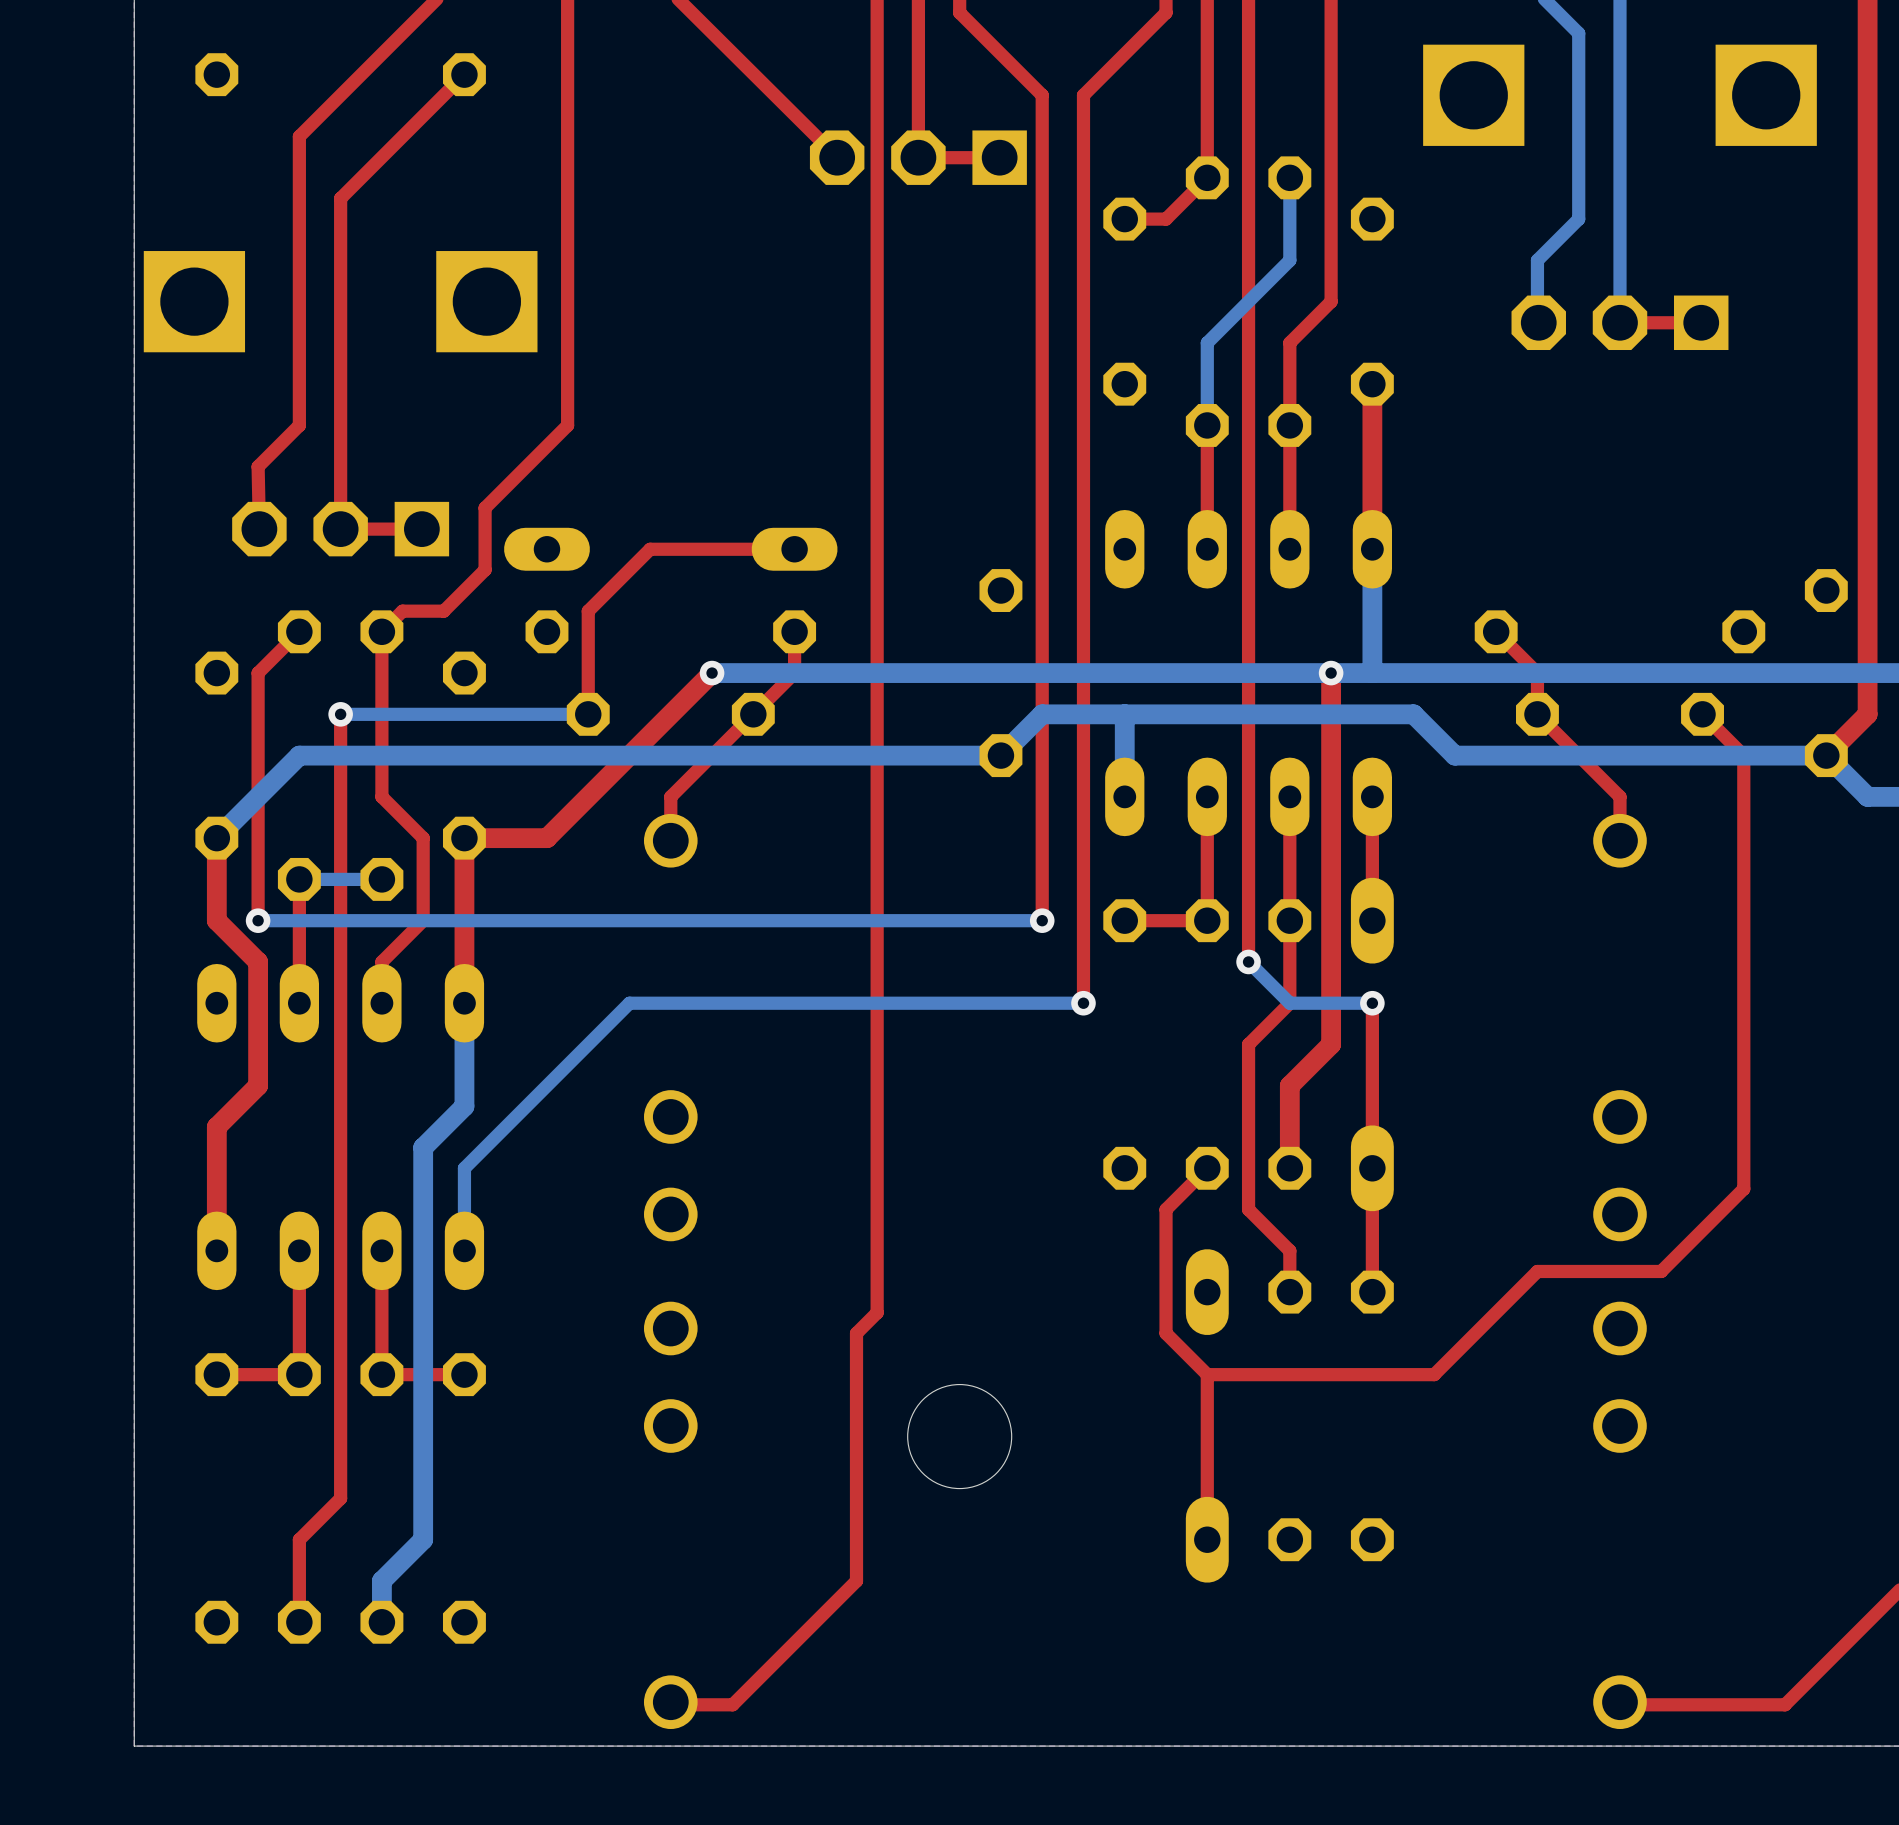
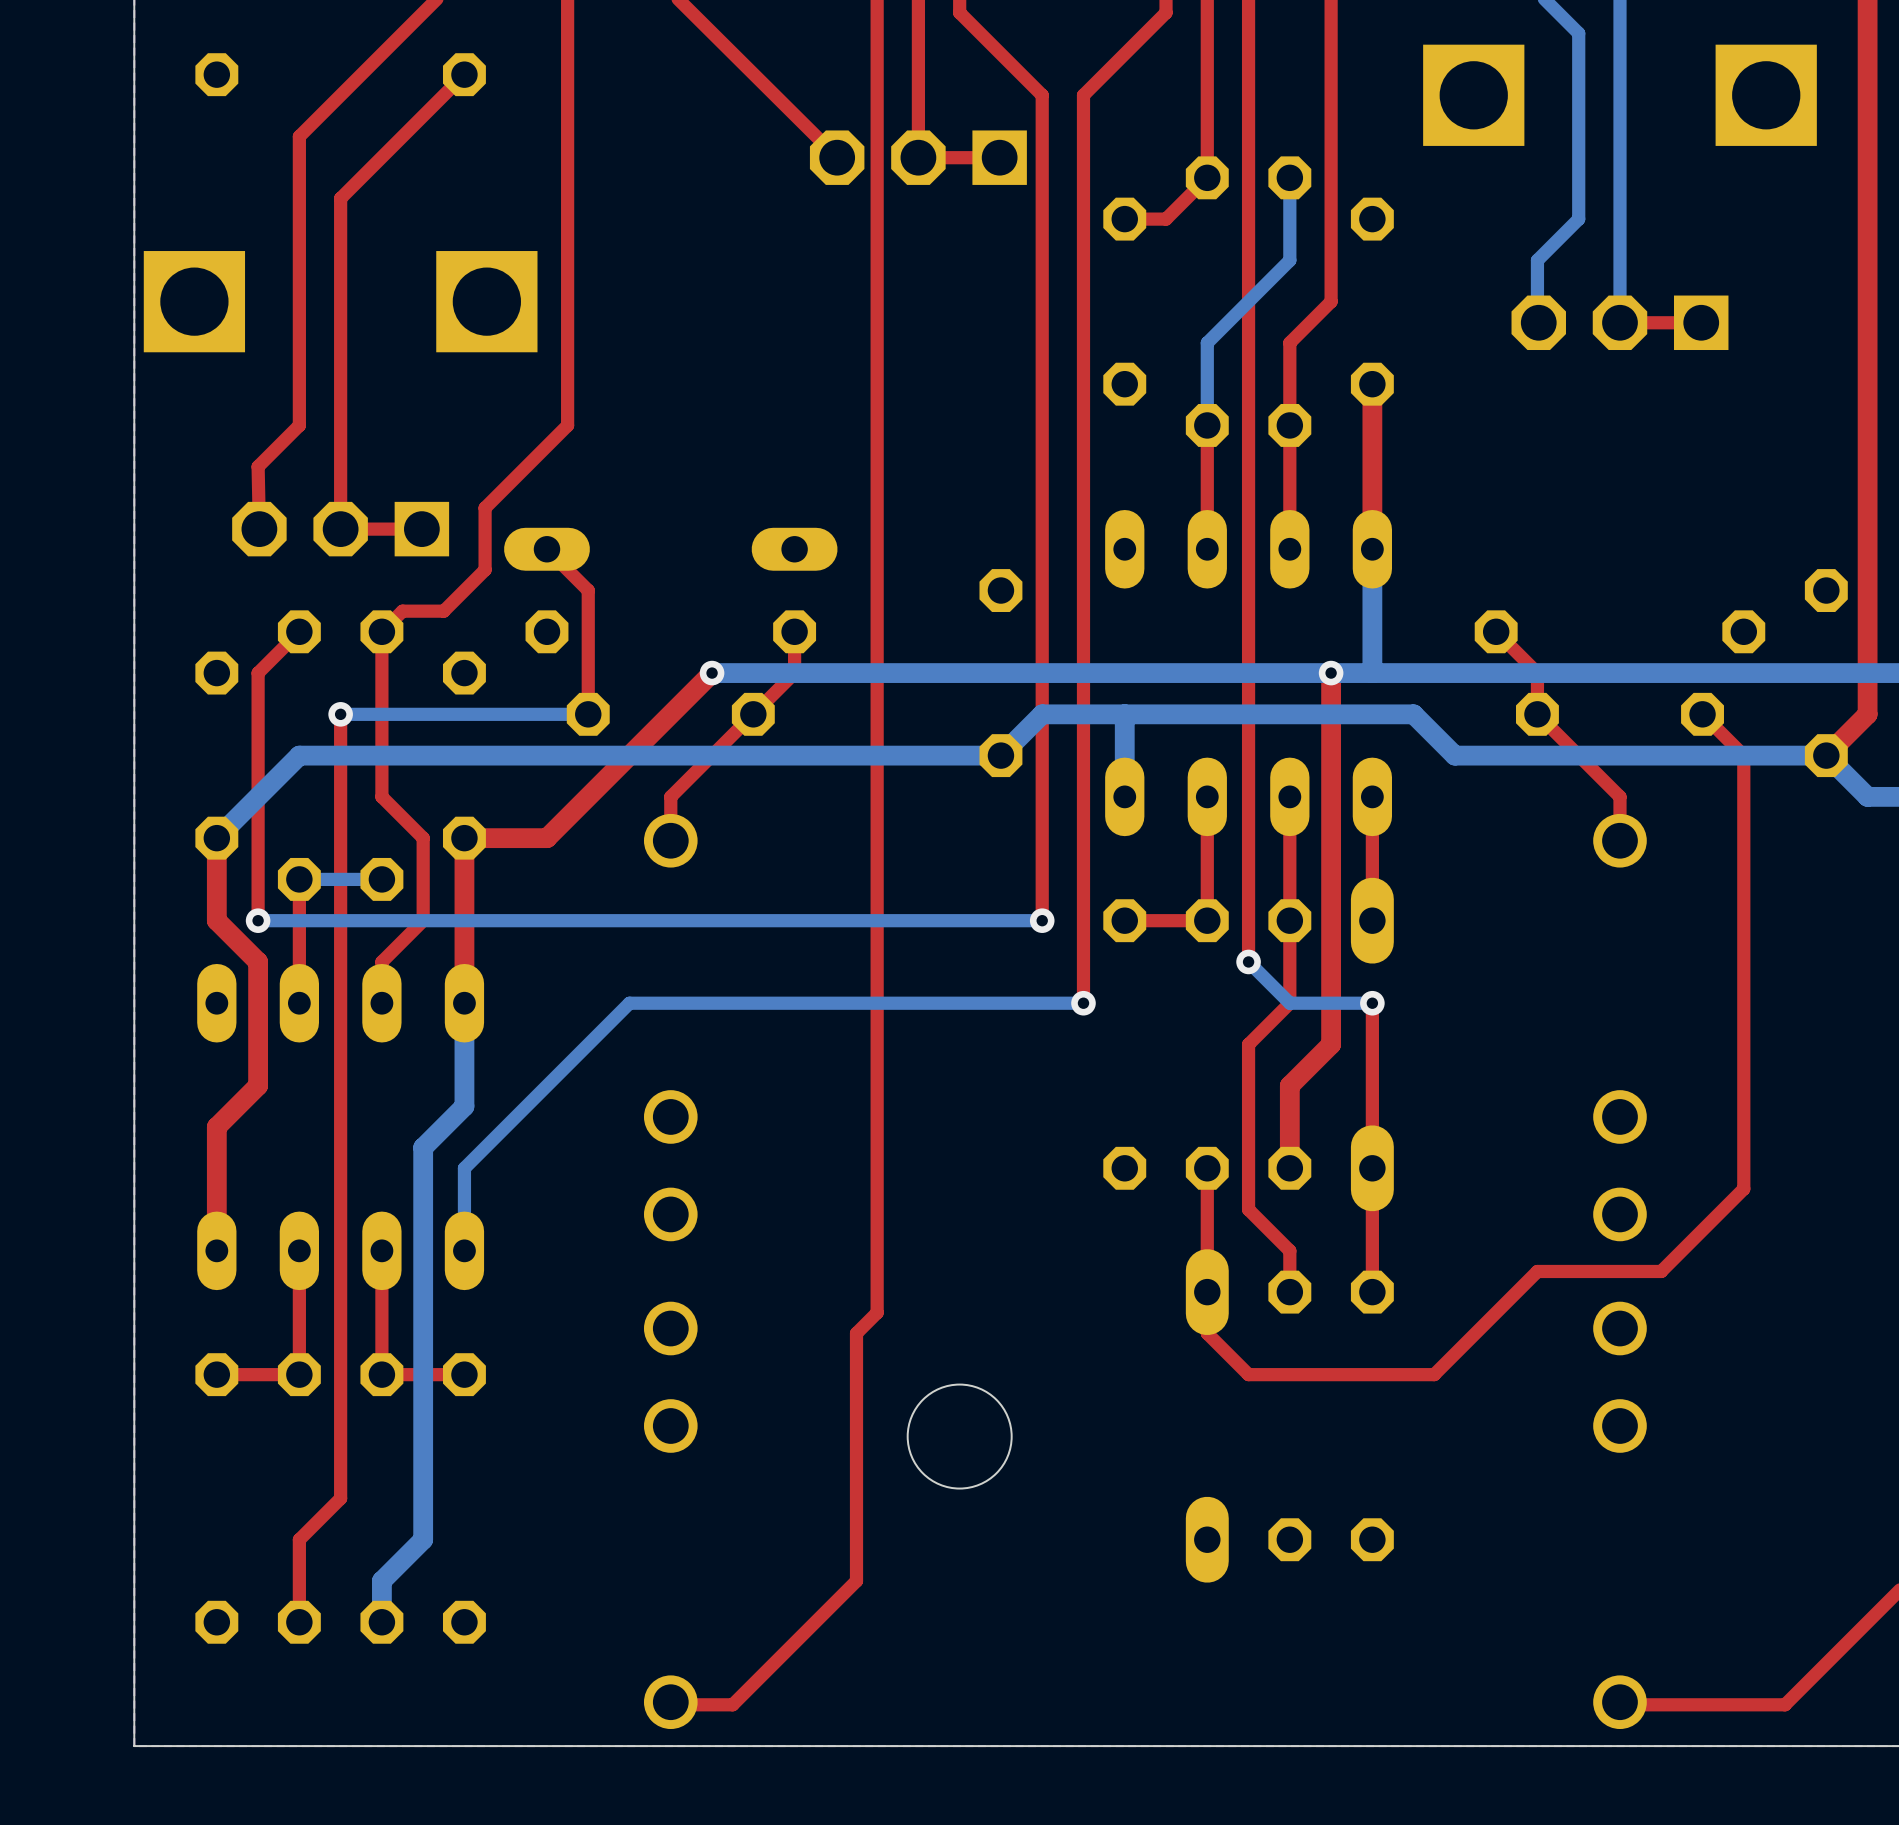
top track: (794, 549) (650, 549) (588, 611) -> (546, 549) (588, 590) (588, 611)
top track: (1207, 1168) (1166, 1209) (1166, 1333) (1207, 1374) -> (1207, 1168) (1207, 1333) (1248, 1374)
top track: (1207, 1374) (1207, 1539) -> none
top track: (1248, 1374) (1207, 1374) -> none

